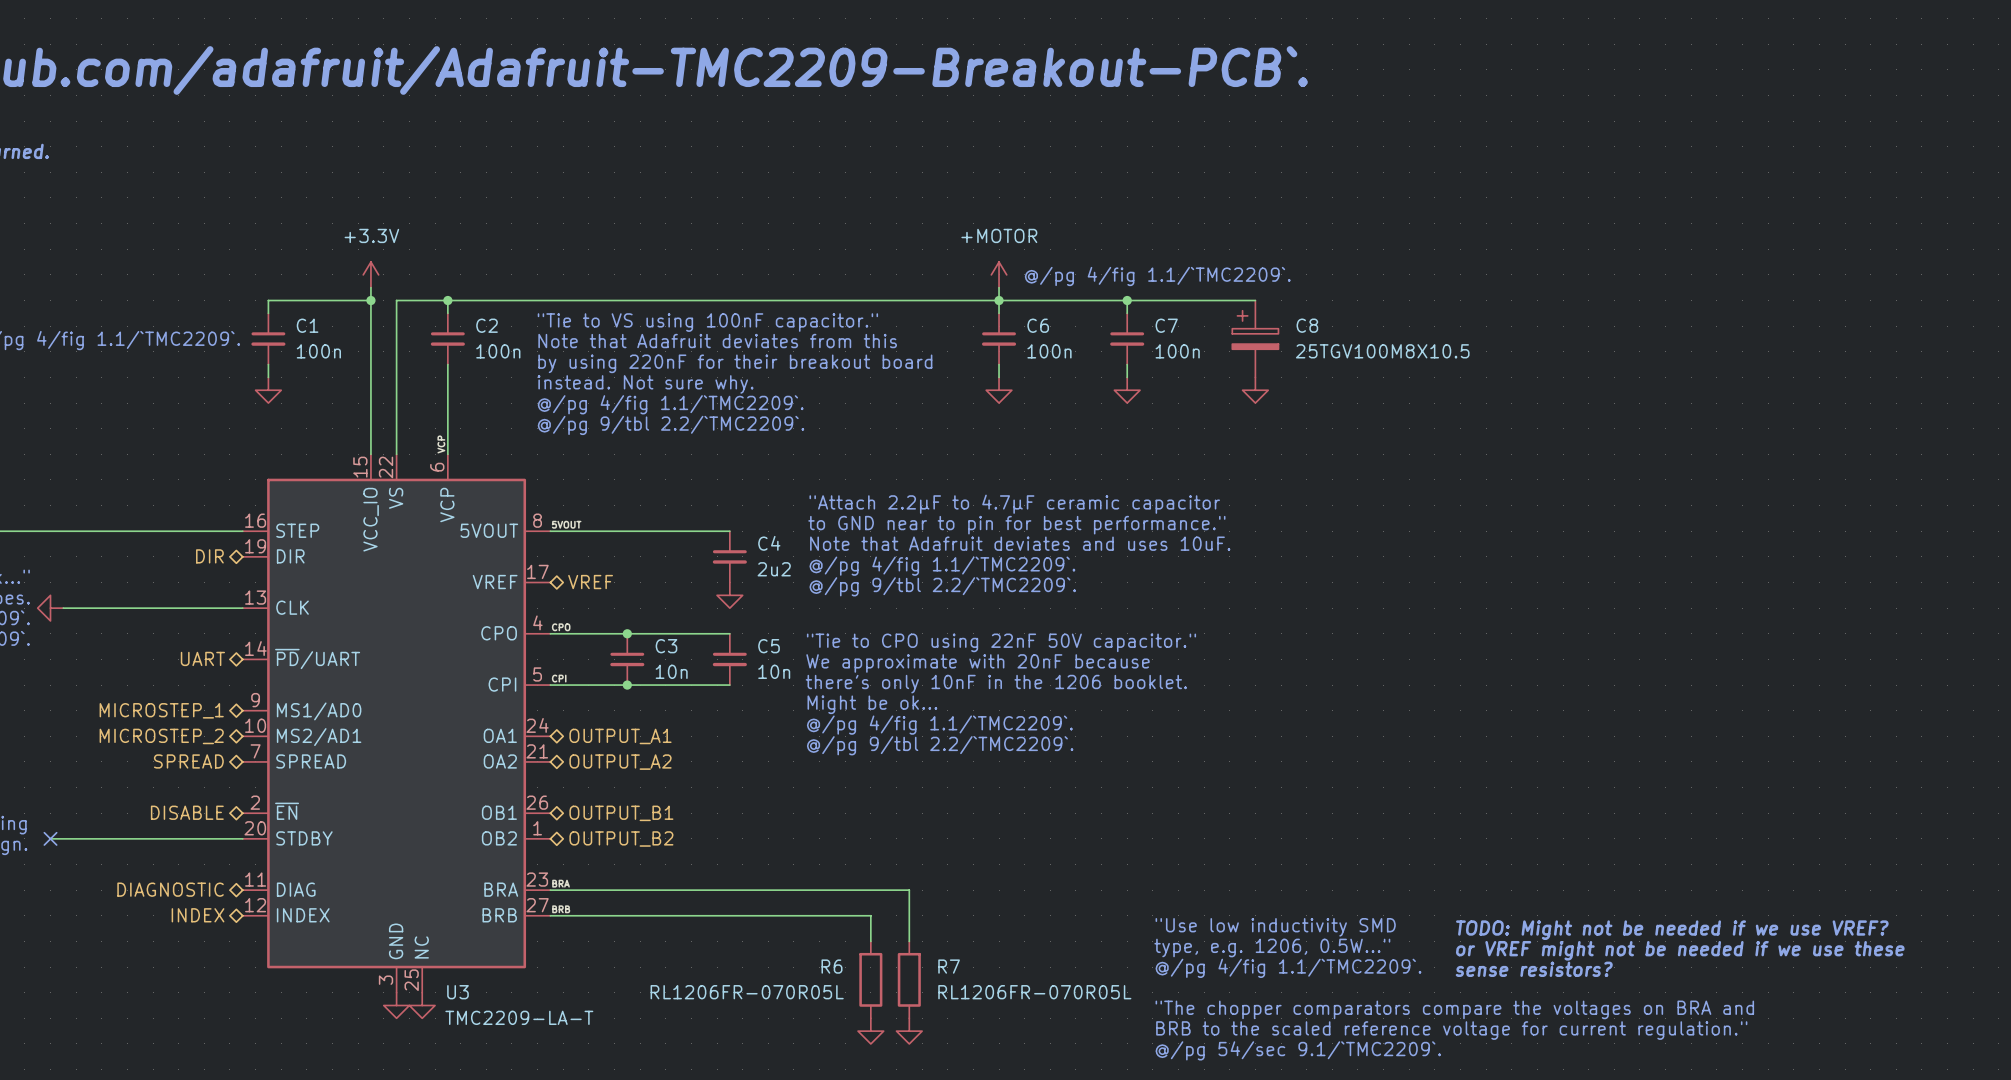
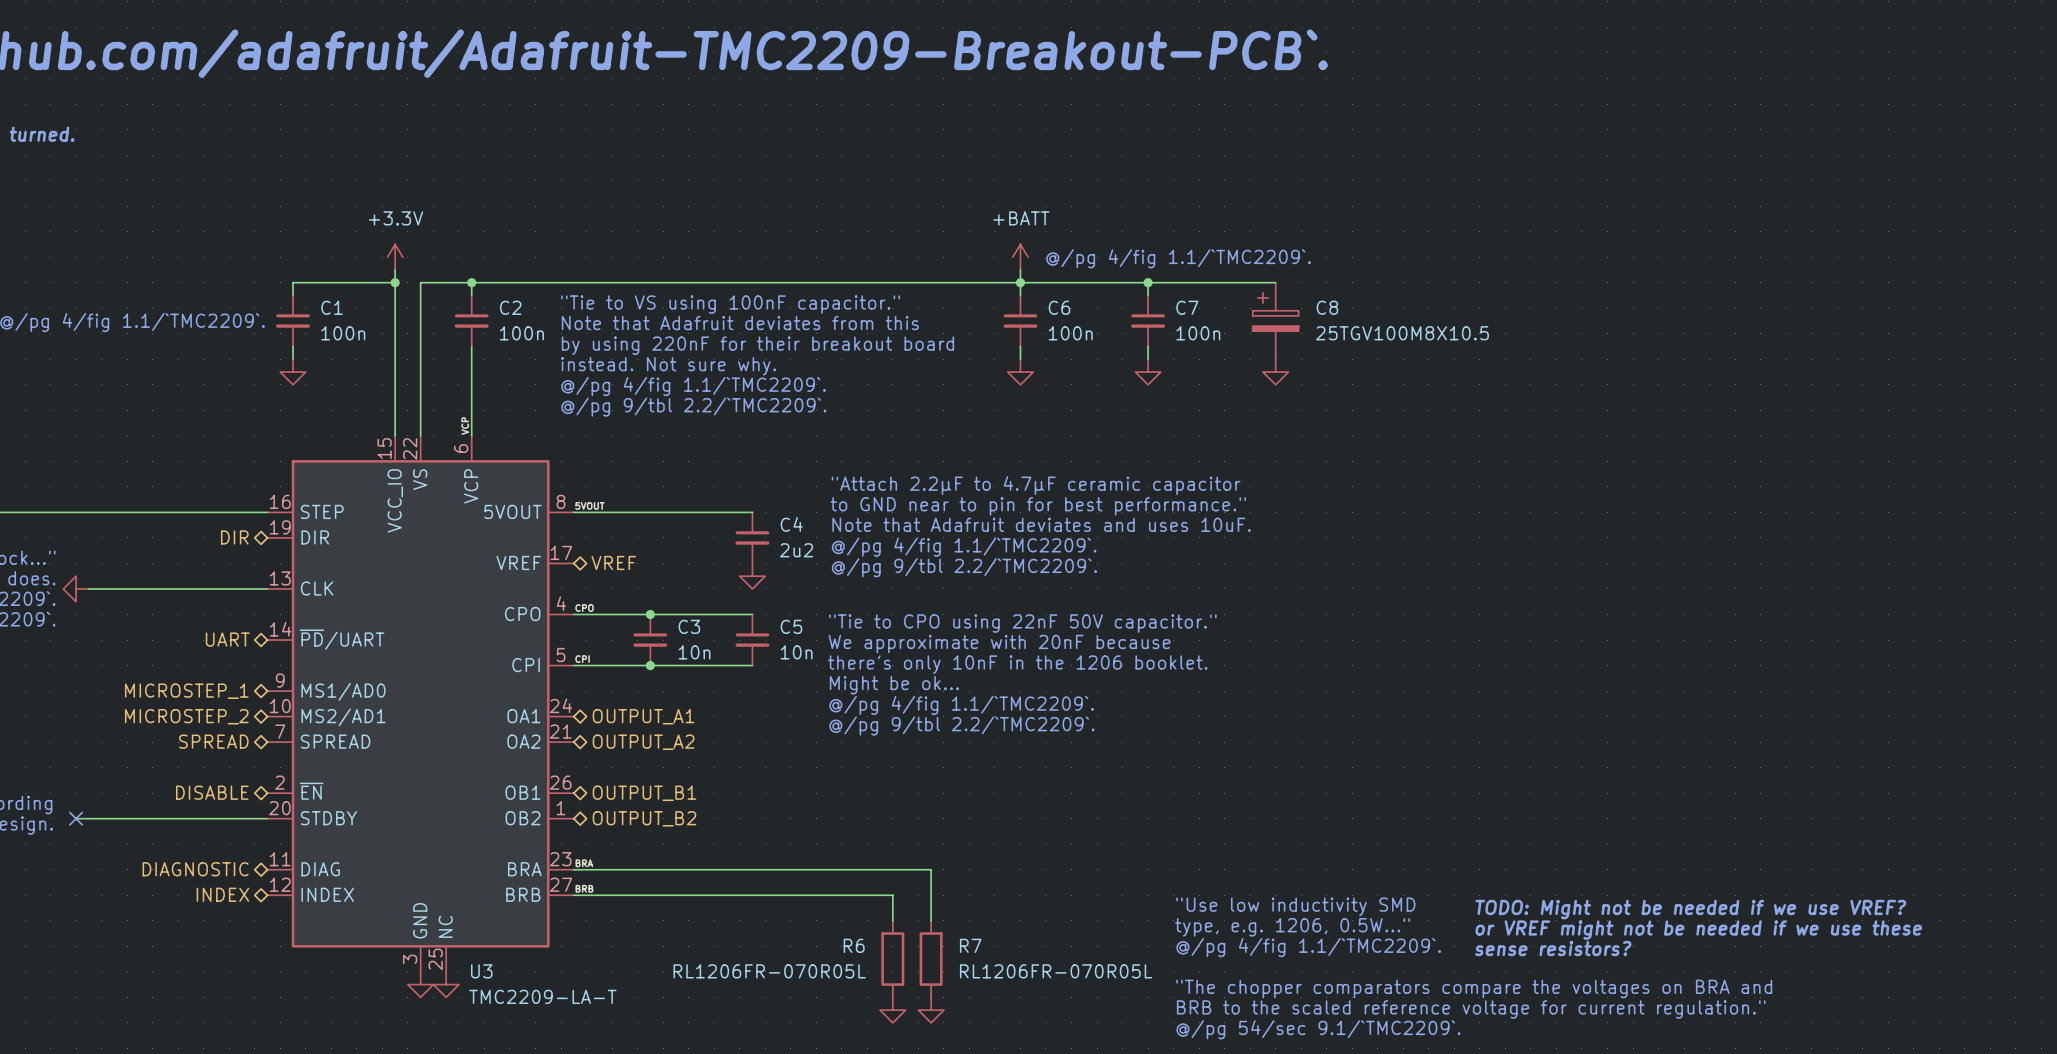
power symbol: +MOTOR (999, 274) -> +BATT (1020, 257)

